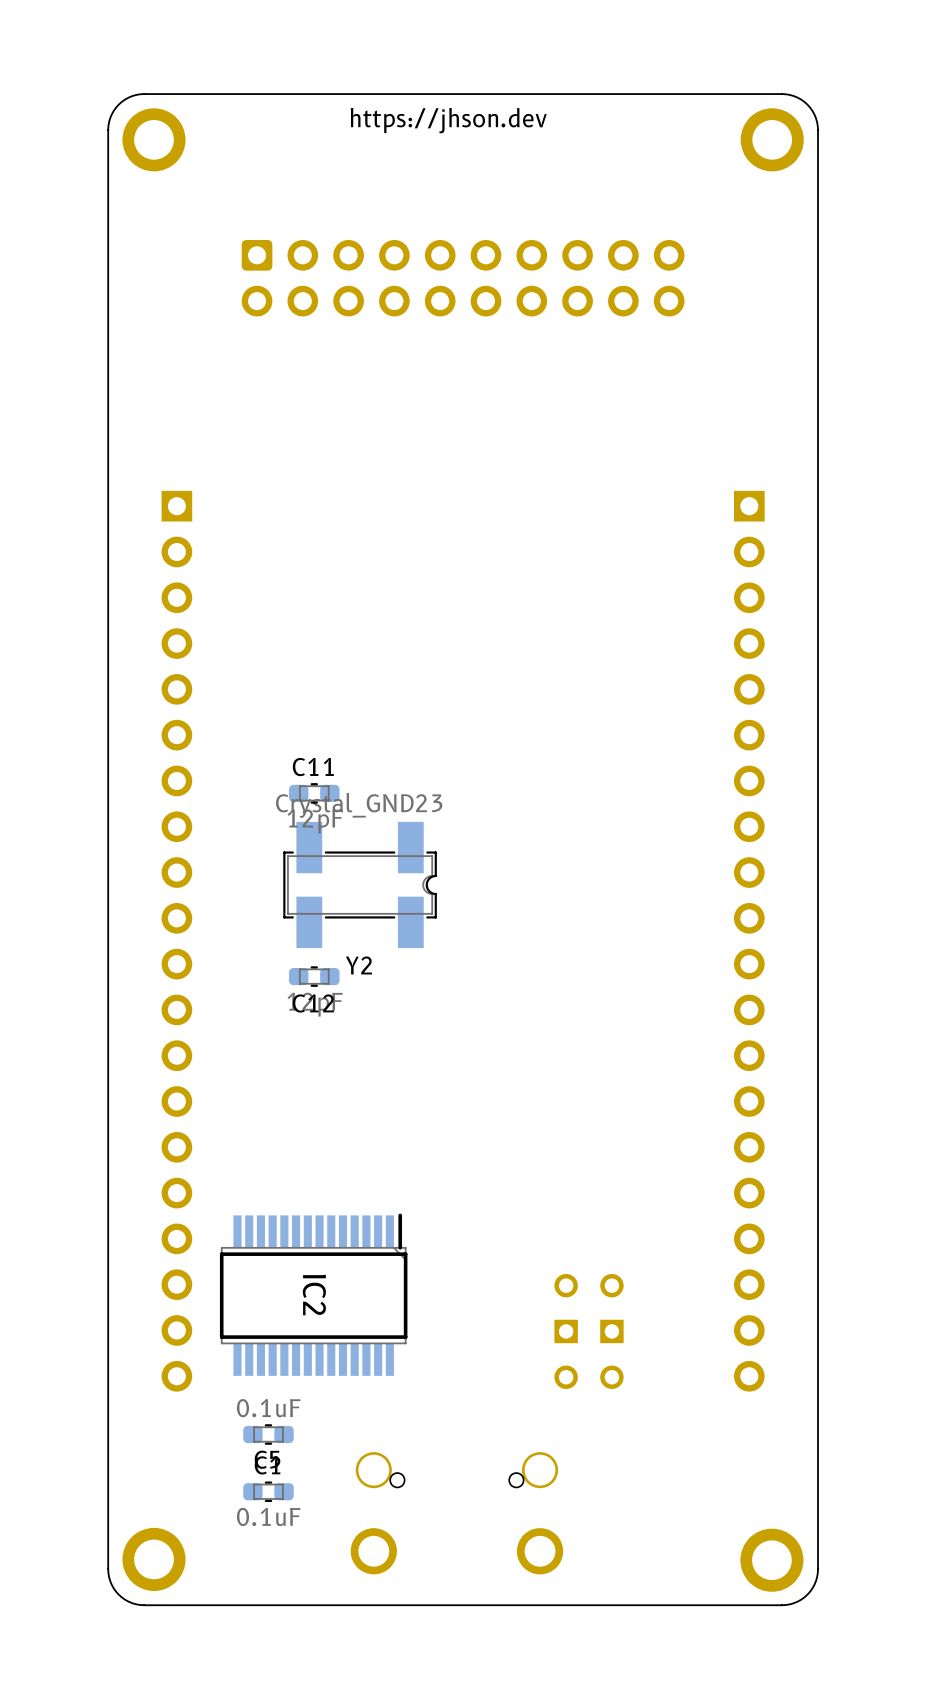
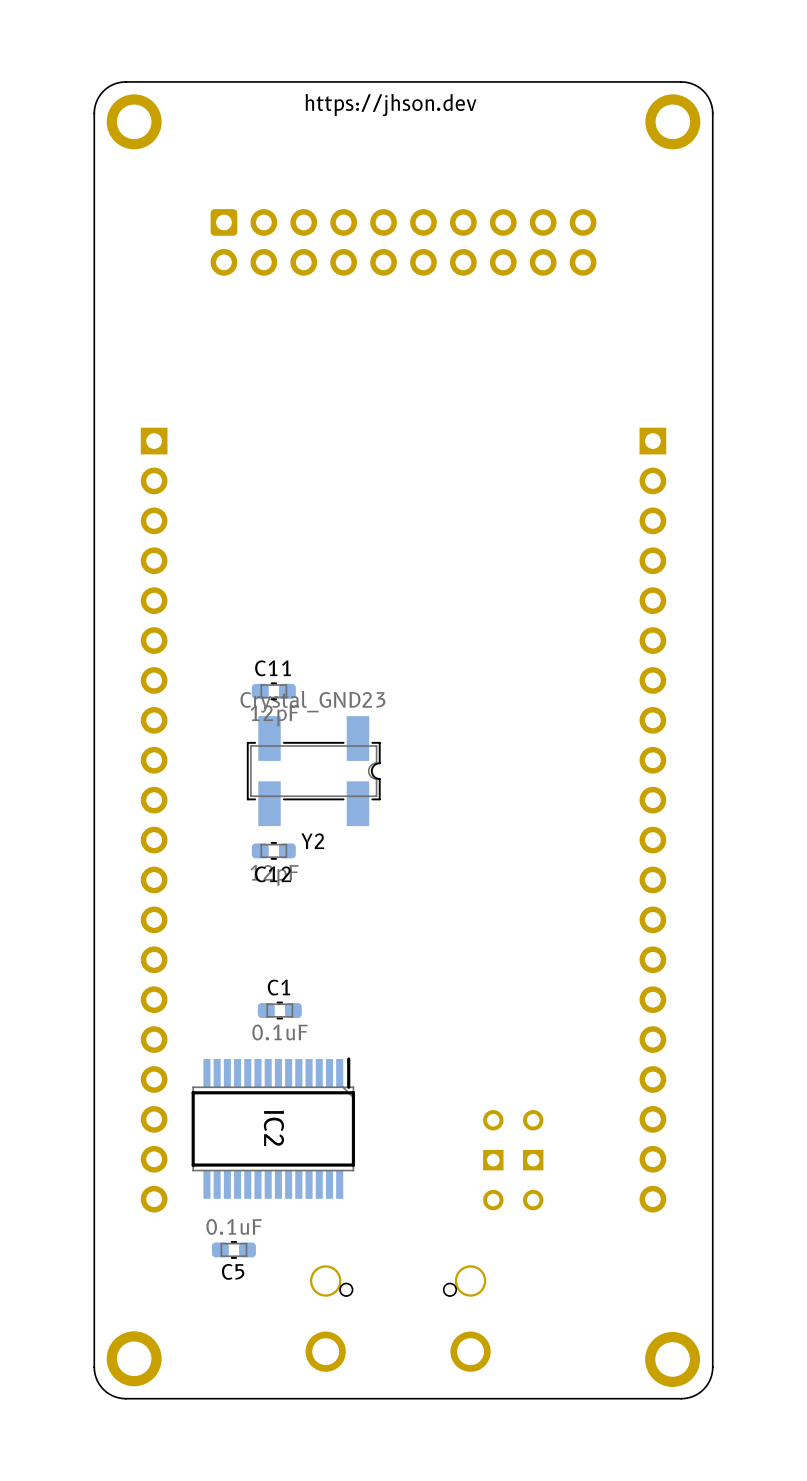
C1 position: (268, 1491) -> (279, 1010)

